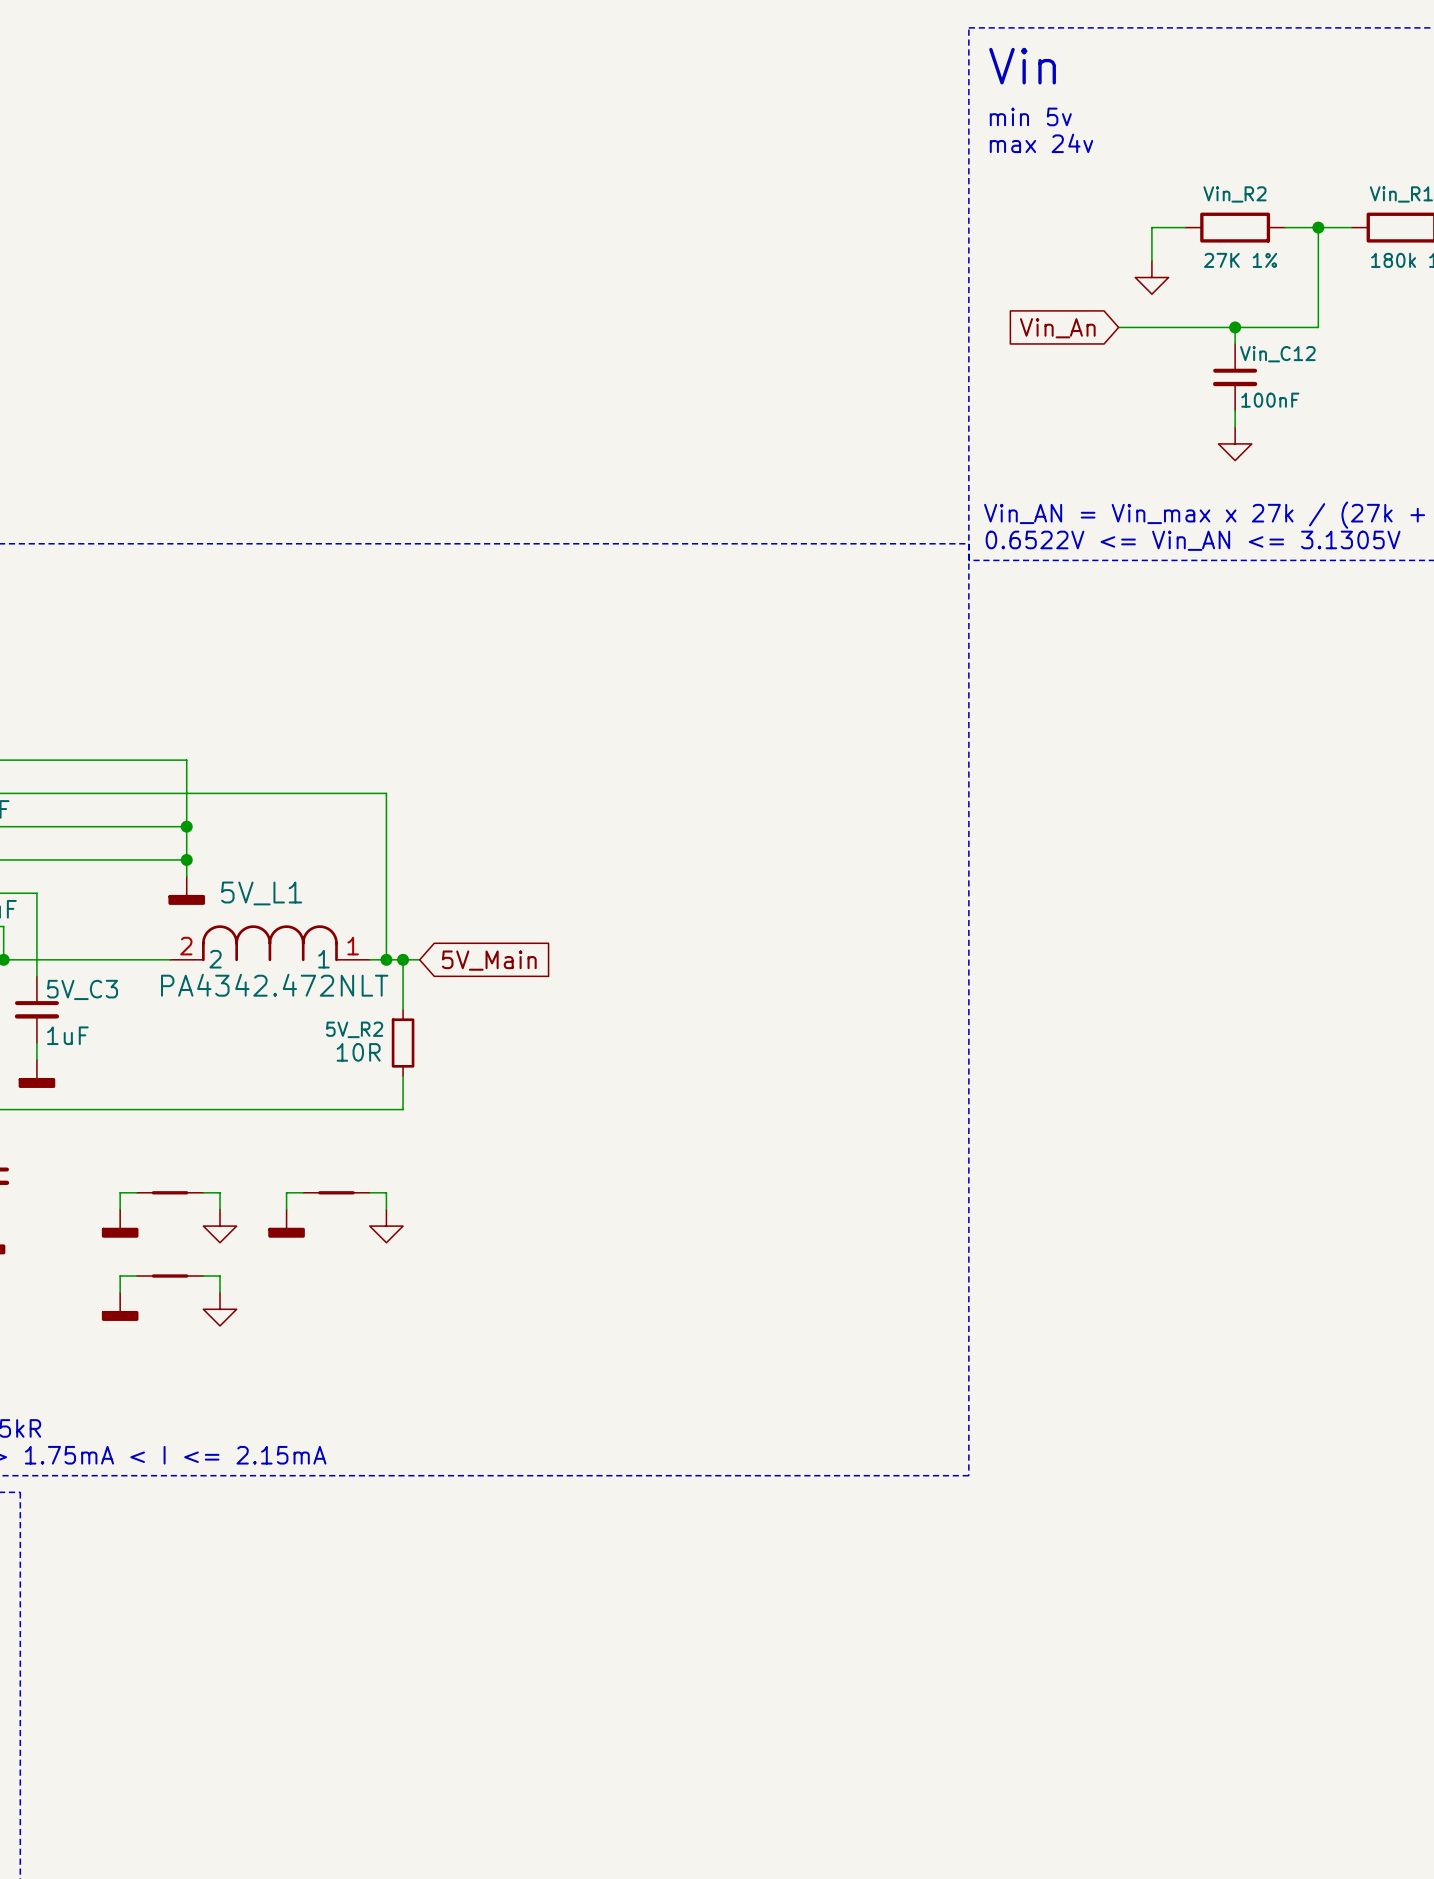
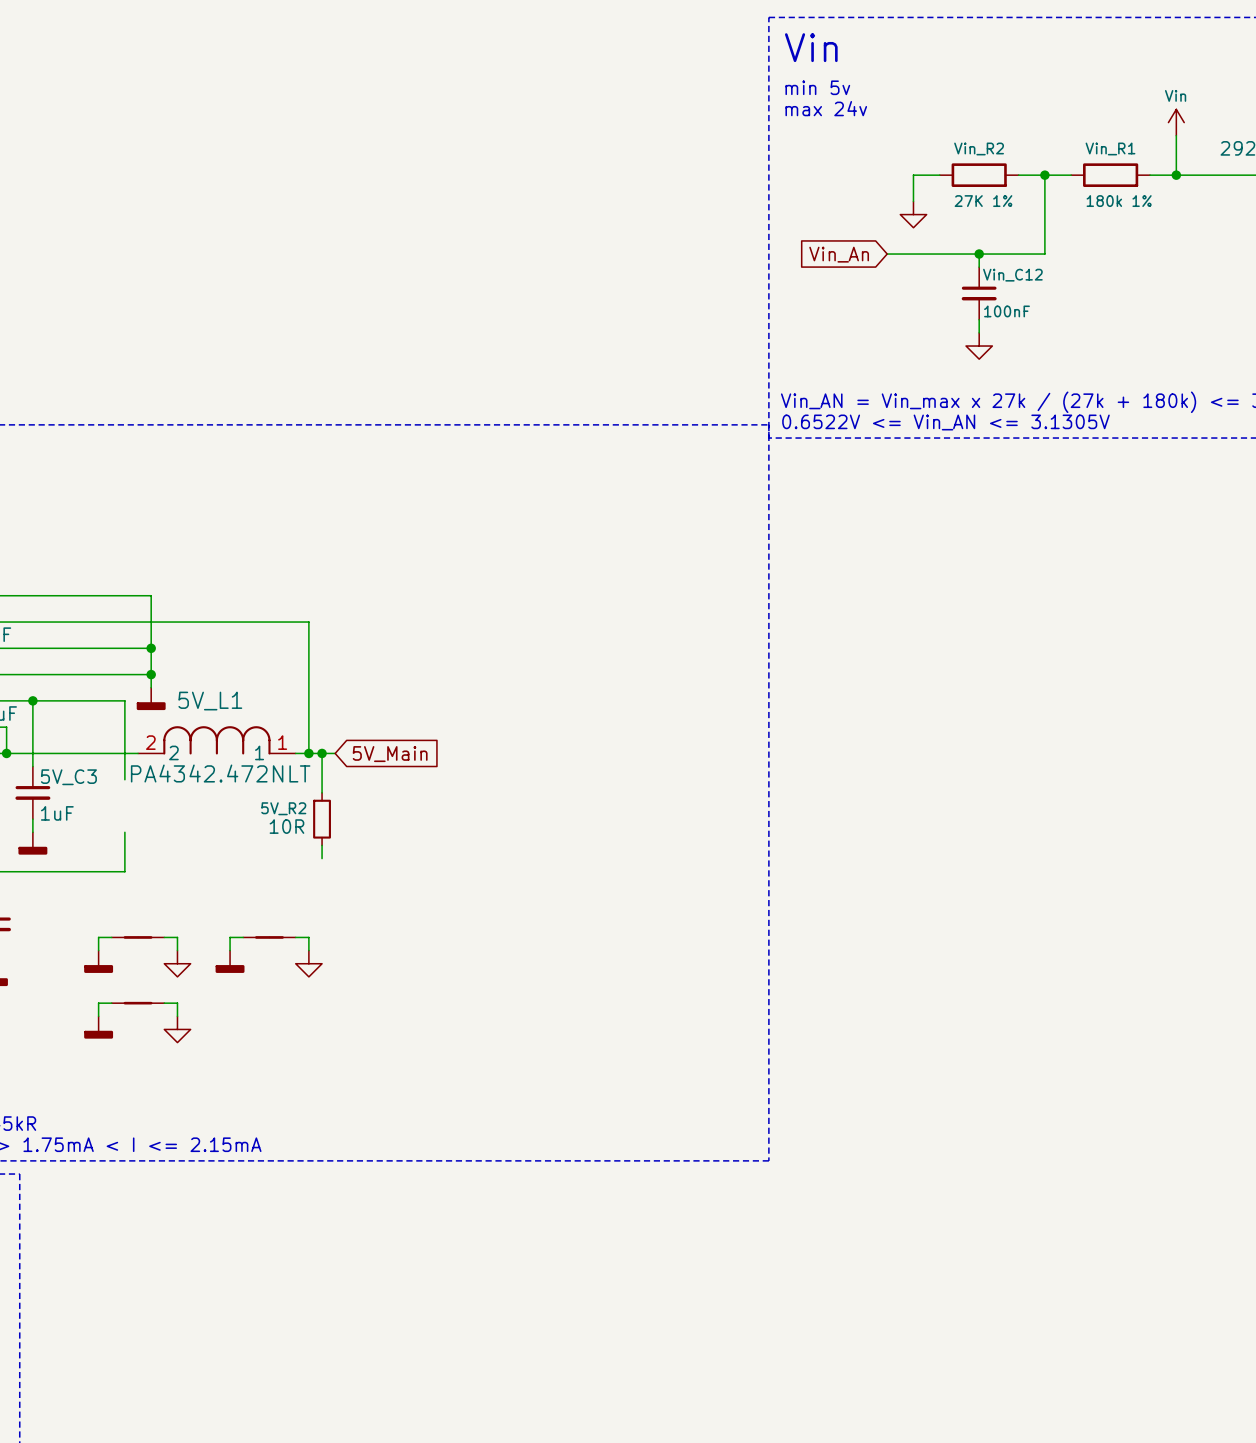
wire: none -> (32, 700) (124, 700) (124, 779)
junction: none -> (32, 700)
wire: (403, 1092) (403, 1109) (153, 1109) -> (124, 832) (124, 871)

